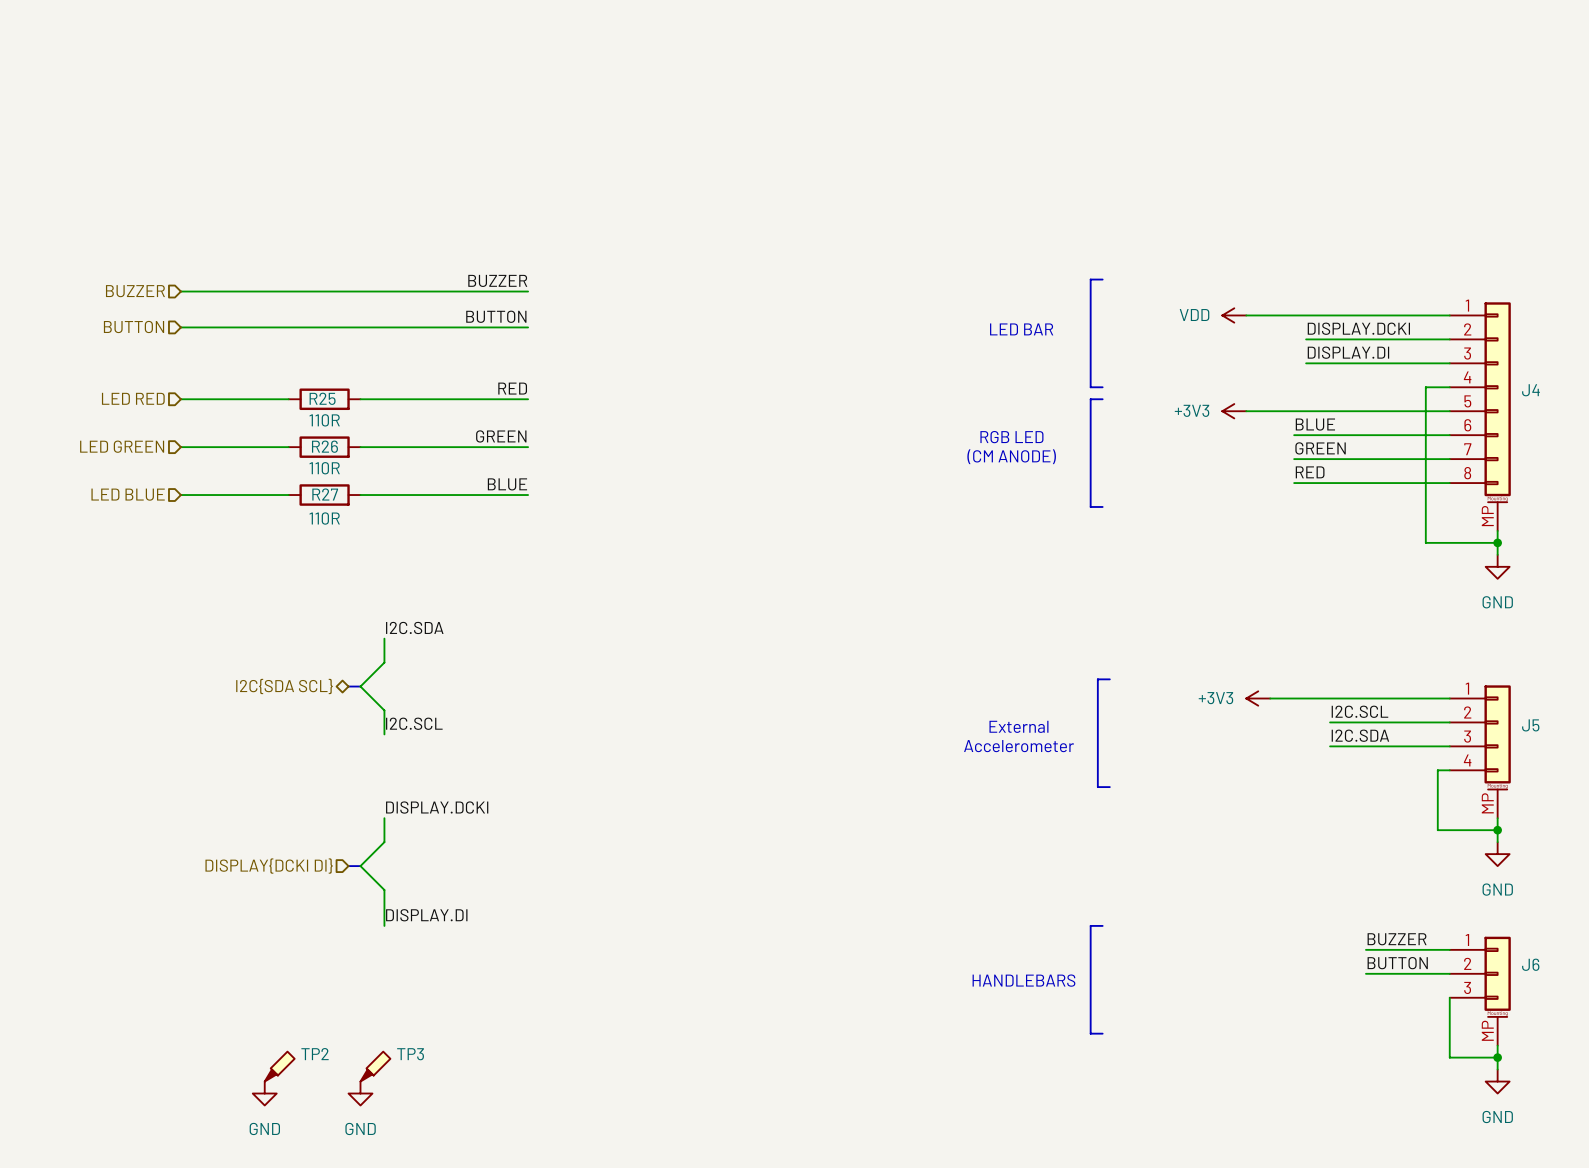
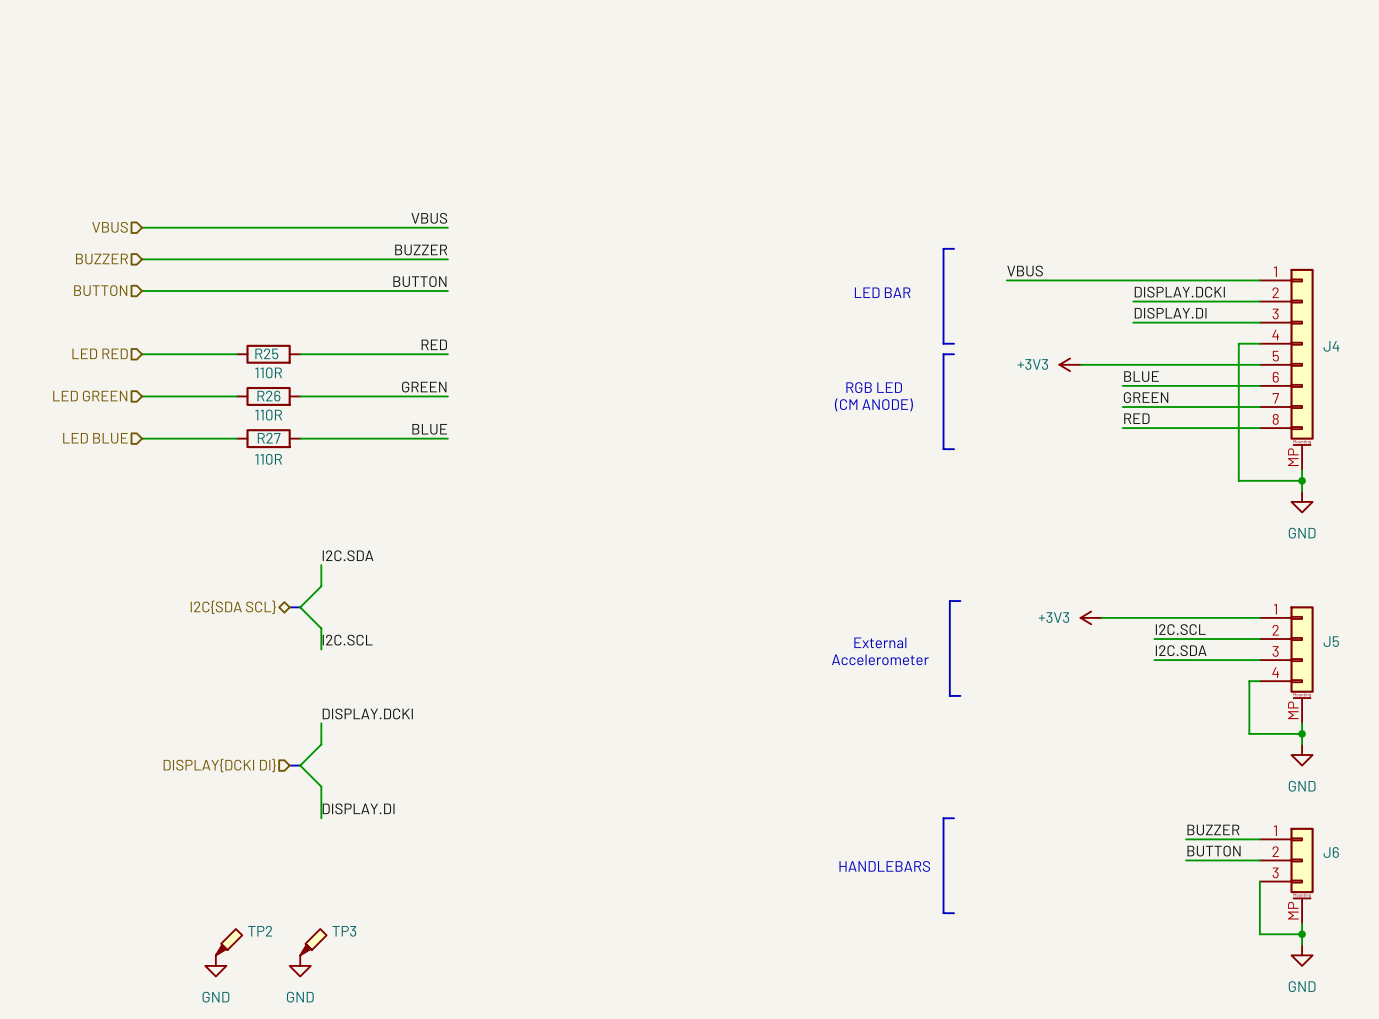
label: none -> VBUS (429, 218)
hierarchical label: none -> VBUS (110, 227)
wire: none -> (142, 227) (447, 227)
label: none -> VBUS (1025, 271)
wire: none -> (1006, 280) (1080, 280)
power symbol: VDD (1234, 315) -> none

